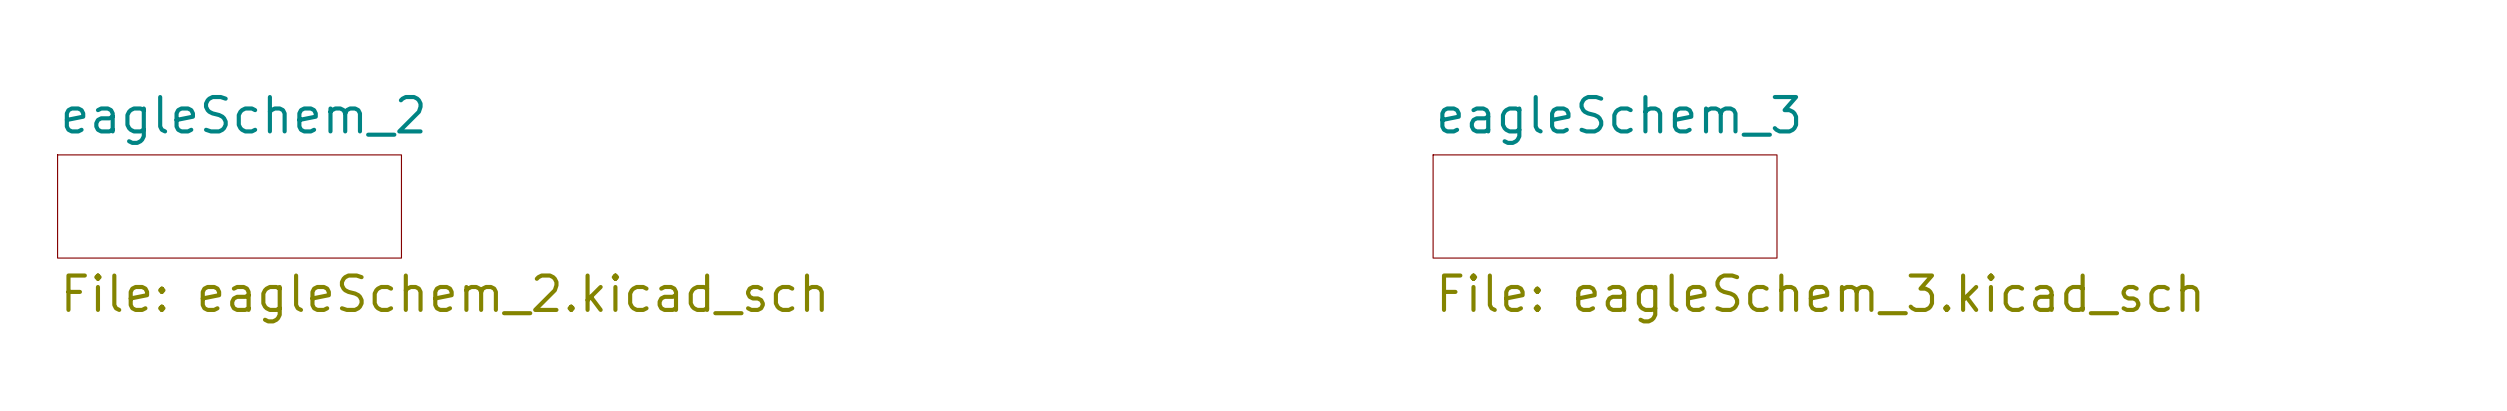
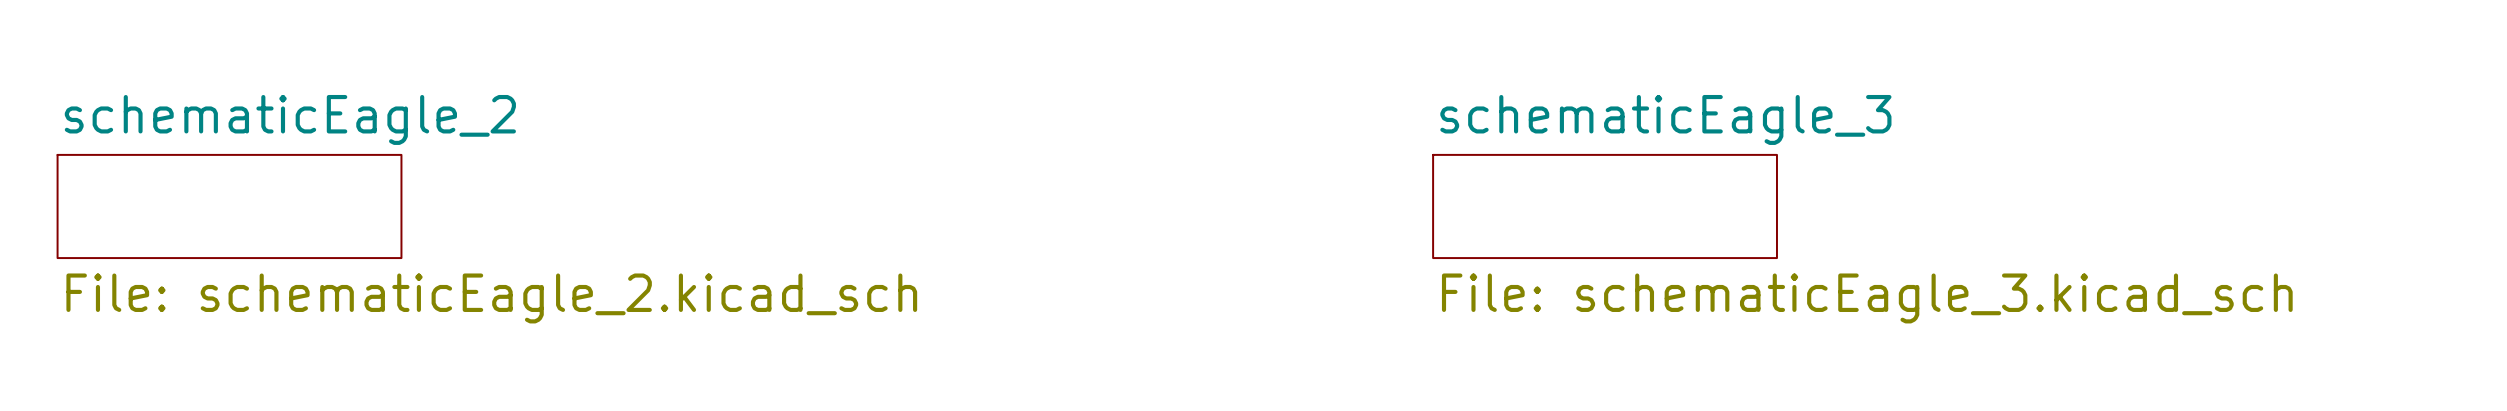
sheet eagleSchem_2 name: eagleSchem_2 (243, 119) -> schematicEagle_2 (290, 119)
sheet eagleSchem_3 name: eagleSchem_3 (1619, 119) -> schematicEagle_3 (1665, 119)
sheet eagleSchem_2 value: File: eagleSchem_2.kicad_sch (445, 298) -> File: schematicEagle_2.kicad_sch (491, 298)
sheet eagleSchem_3 value: File: eagleSchem_3.kicad_sch (1820, 298) -> File: schematicEagle_3.kicad_sch (1867, 298)

